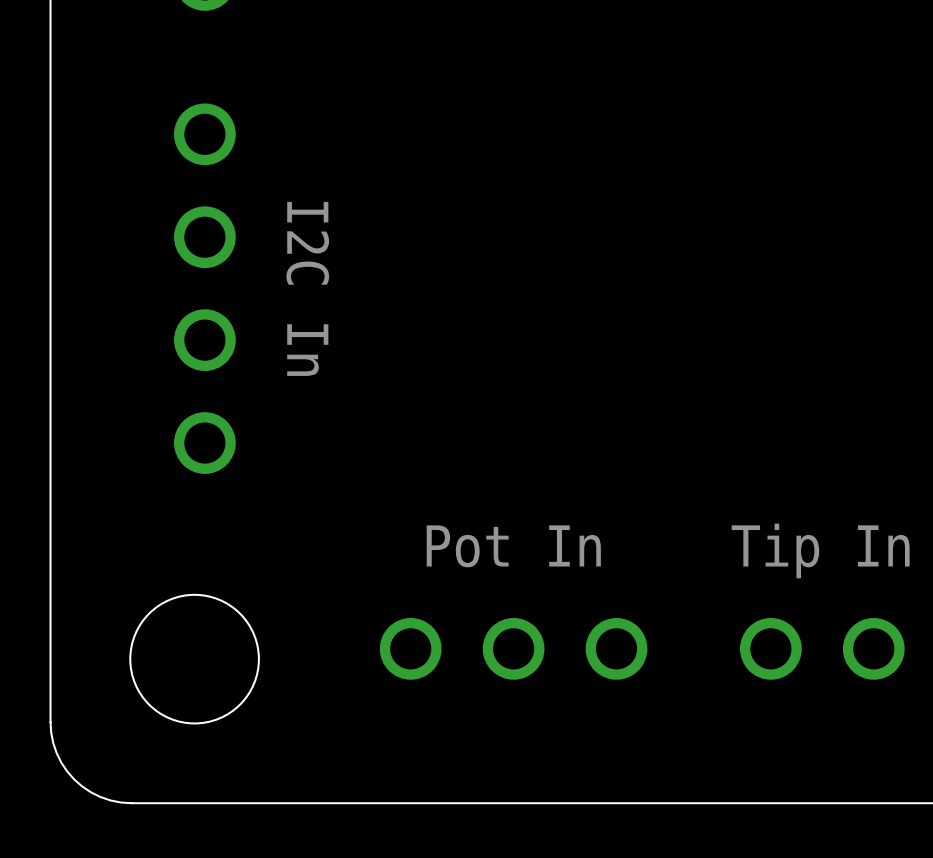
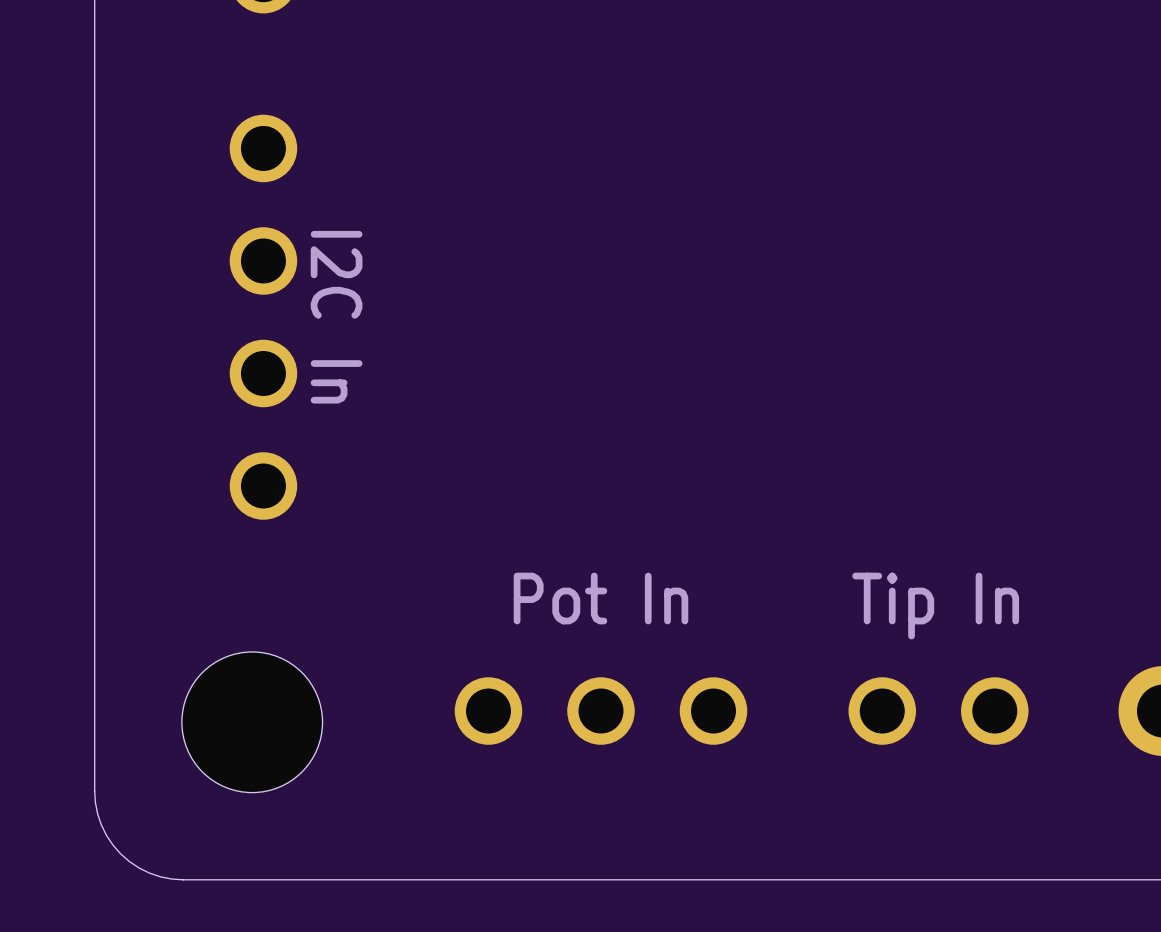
text position: I2C In (307, 288) -> I2C In (336, 317)

